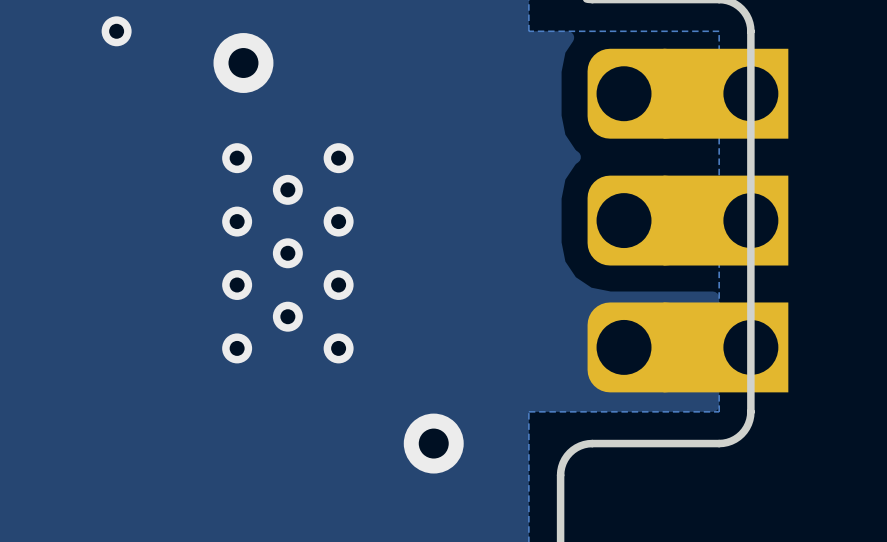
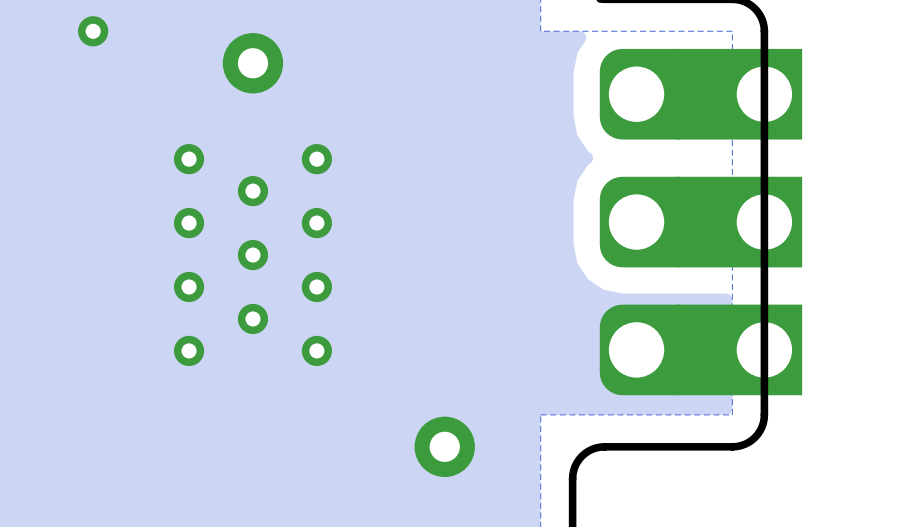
via position: (116, 31) -> (93, 31)
via: none -> (189, 159)
via: (237, 158) -> none
via: none -> (316, 159)
via: (338, 158) -> none
via: none -> (252, 191)
via: (287, 189) -> none
via: none -> (189, 223)
via: (237, 221) -> none
via: none -> (316, 223)
via: (338, 221) -> none
via: none -> (252, 255)
via: (287, 253) -> none
via: none -> (189, 287)
via: (237, 284) -> none
via: none -> (316, 287)
via: (338, 284) -> none
via: none -> (252, 318)
via: (287, 316) -> none
via: none -> (189, 350)
via: (237, 348) -> none
via: none -> (316, 350)
via: (338, 348) -> none

